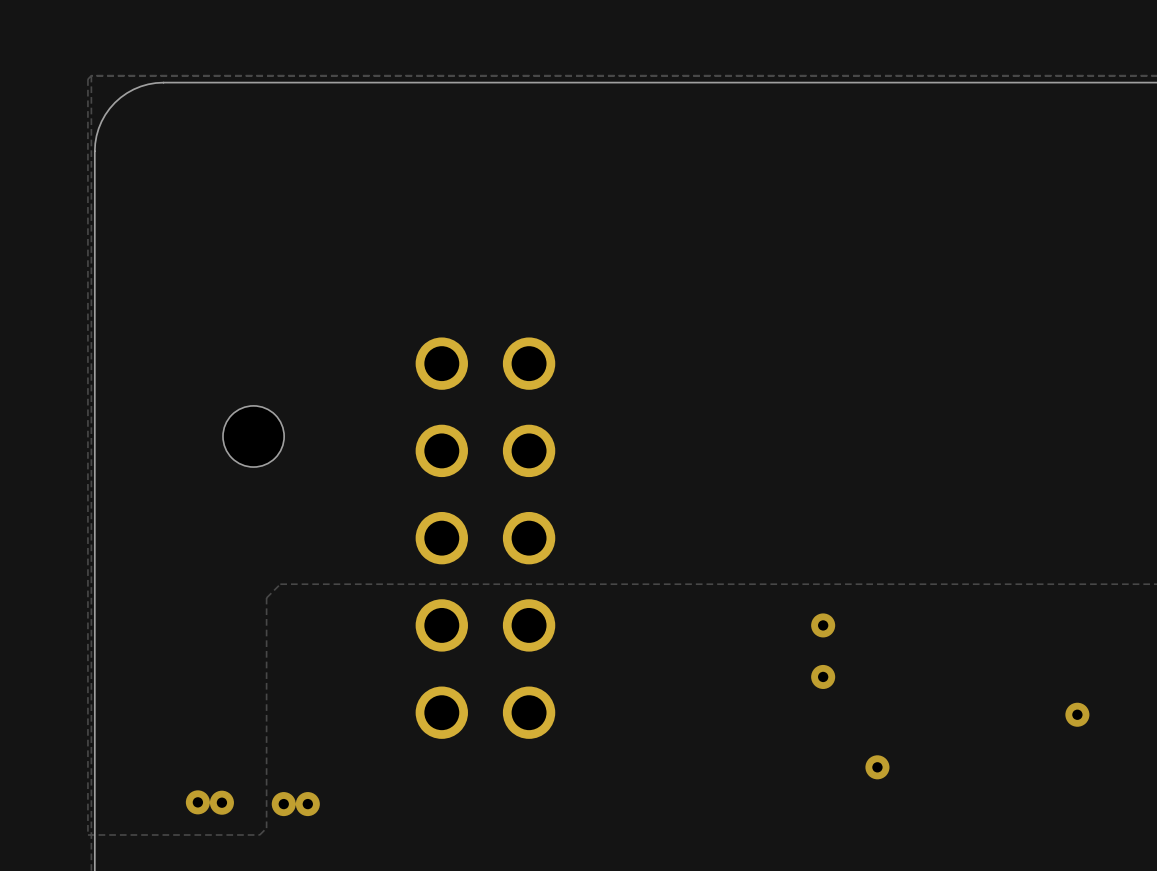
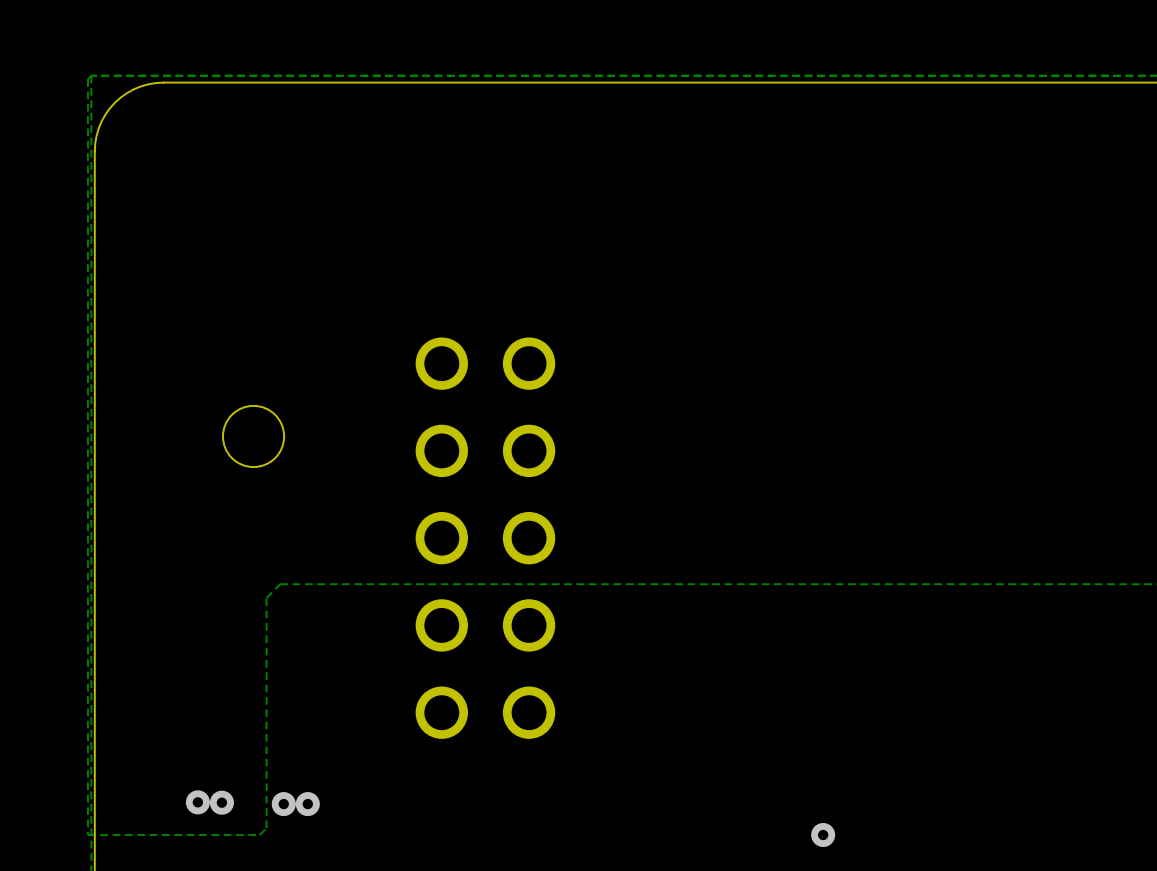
via: (823, 625) -> none
via: (823, 676) -> none
via: (1077, 714) -> none
via: (877, 767) -> none
via: none -> (823, 835)

